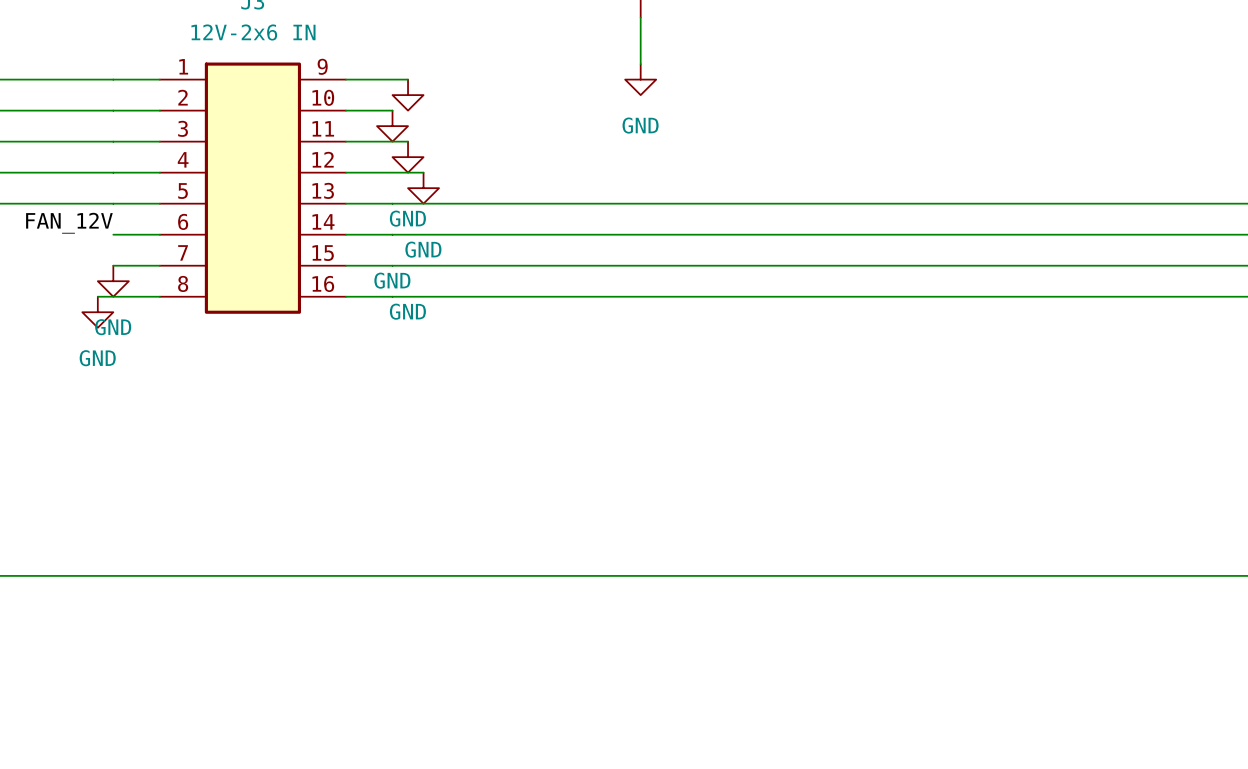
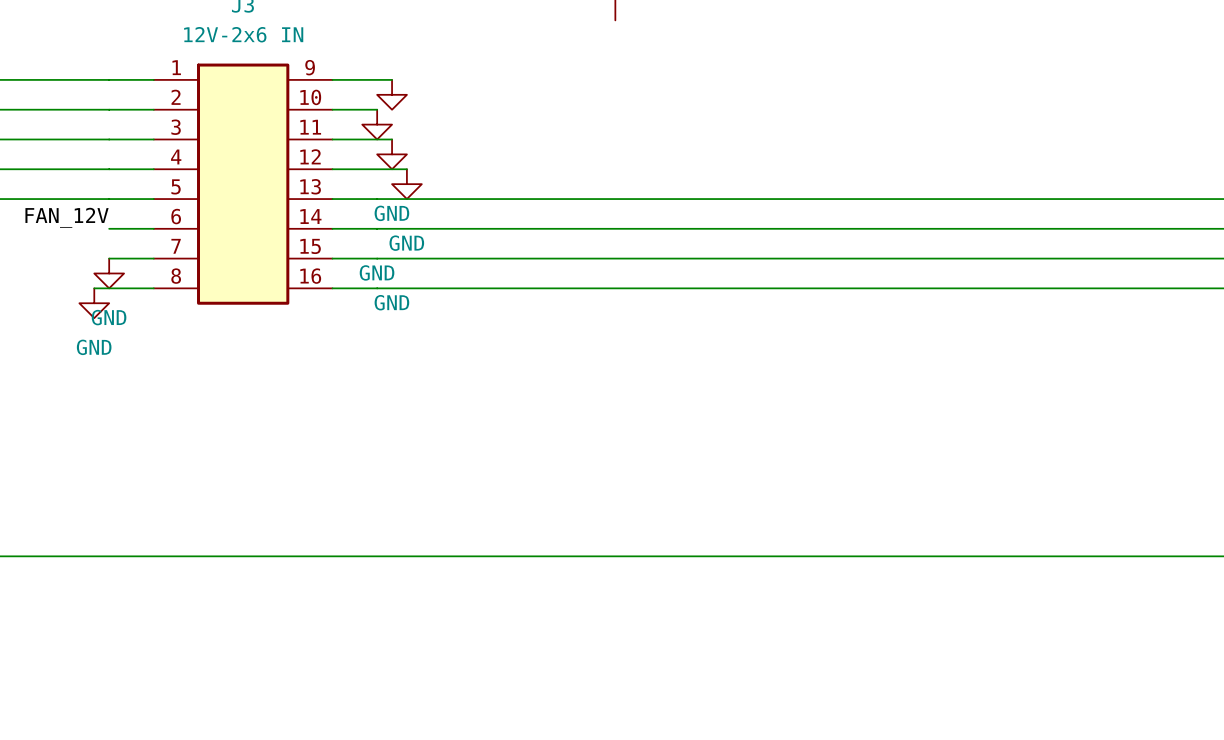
wire: (640, 17) (640, 64) -> none
power symbol: GND (640, 79) -> none

